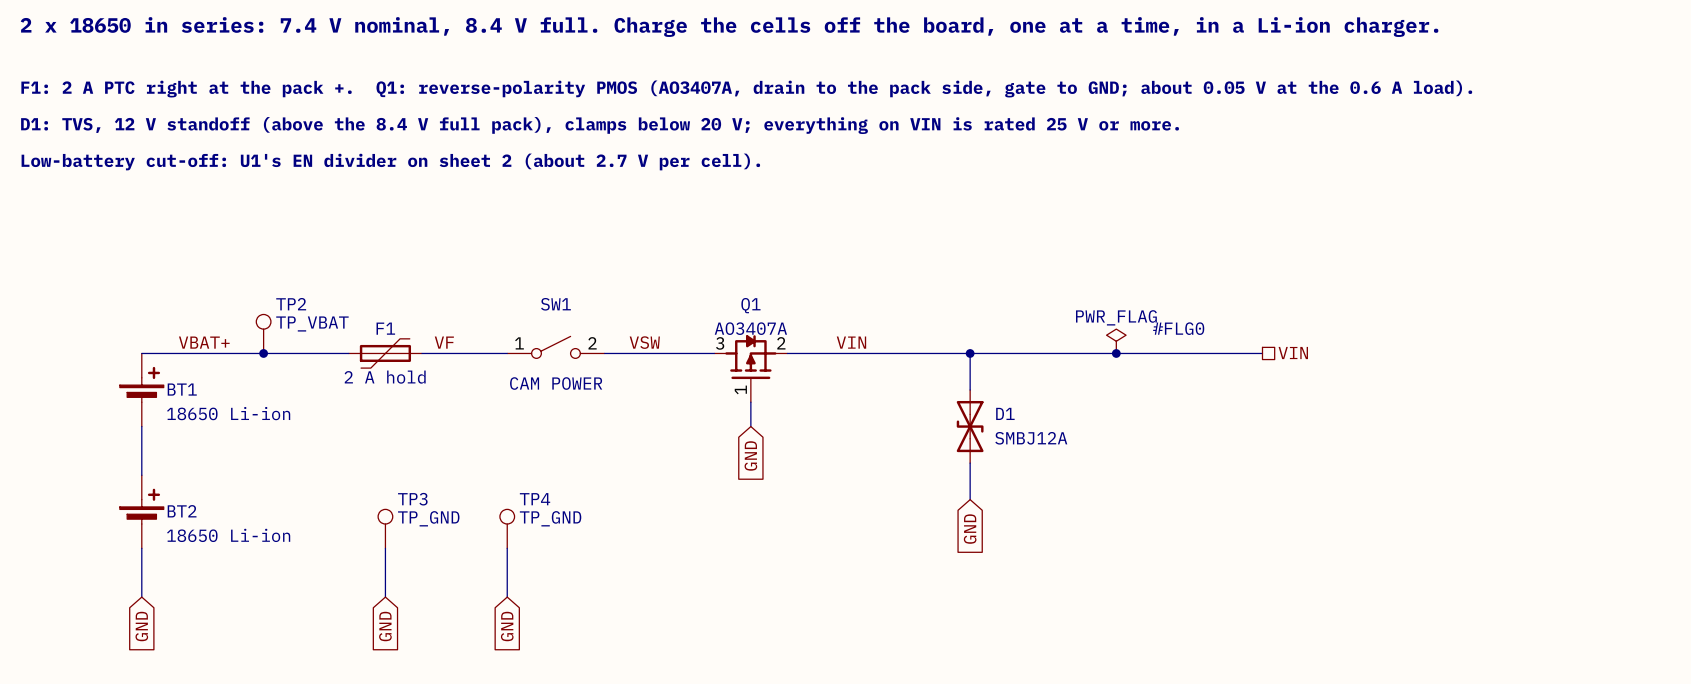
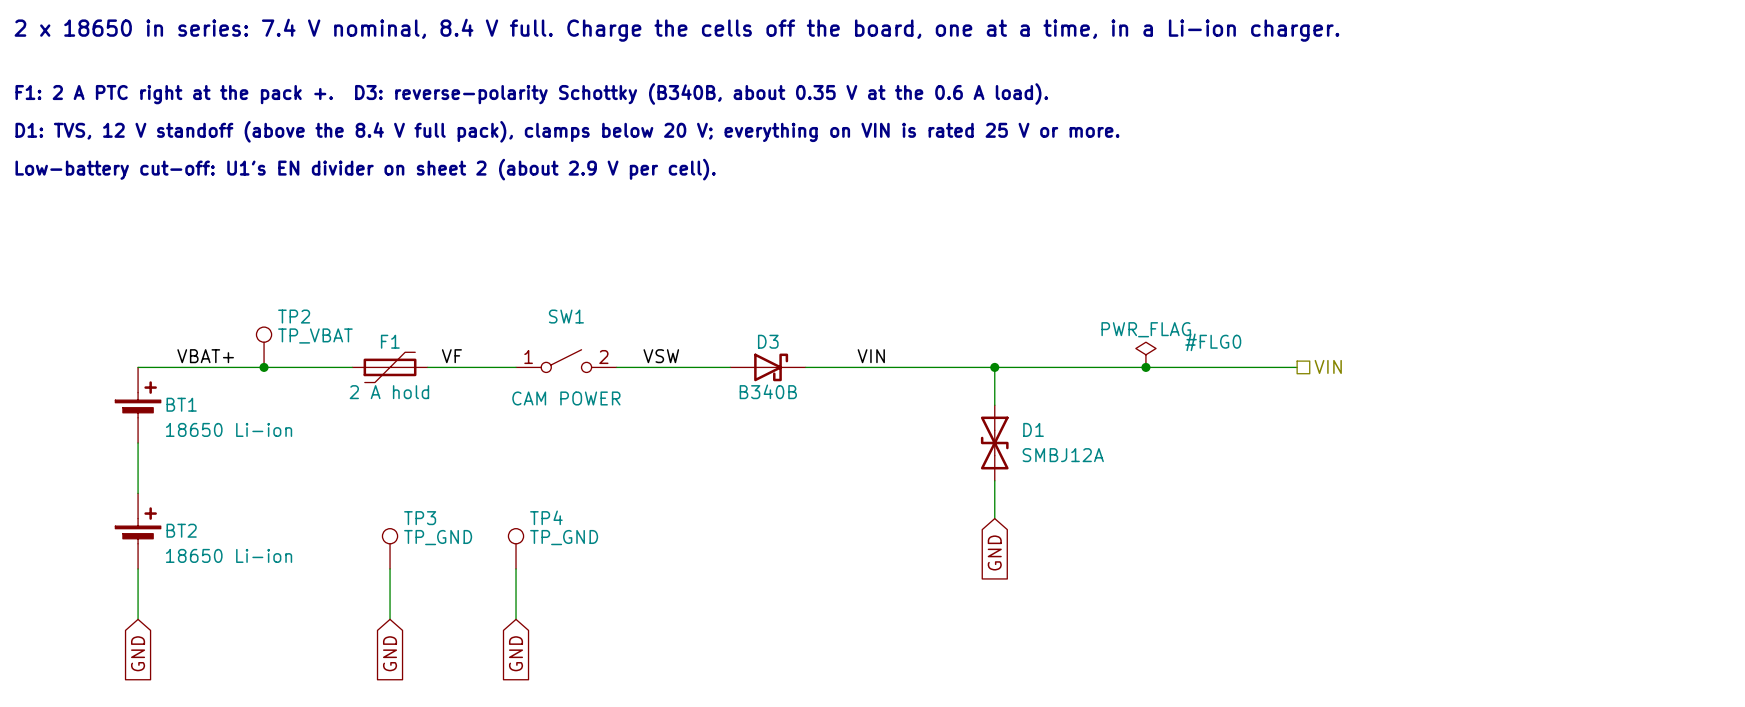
text: F1: 2 A PTC right at the pack +. Q1: reverse-polarity PMOS (AO3407A, drain to the pack side, gate to GND; about 0.05 V at the 0.6 A load). (746, 88) -> F1: 2 A PTC right at the pack +. D3: reverse-polarity Schottky (B340B, about 0.35 V at the 0.6 A load). (531, 94)
text: Low-battery cut-off: U1's EN divider on sheet 2 (about 2.7 V per cell). (390, 161) -> Low-battery cut-off: U1's EN divider on sheet 2 (about 2.9 V per cell). (365, 169)
D3: none -> B340B (767, 367)
Q1: AO3407A (750, 368) -> none
wire: (750, 402) (750, 426) -> none
global label: GND (750, 455) -> none

